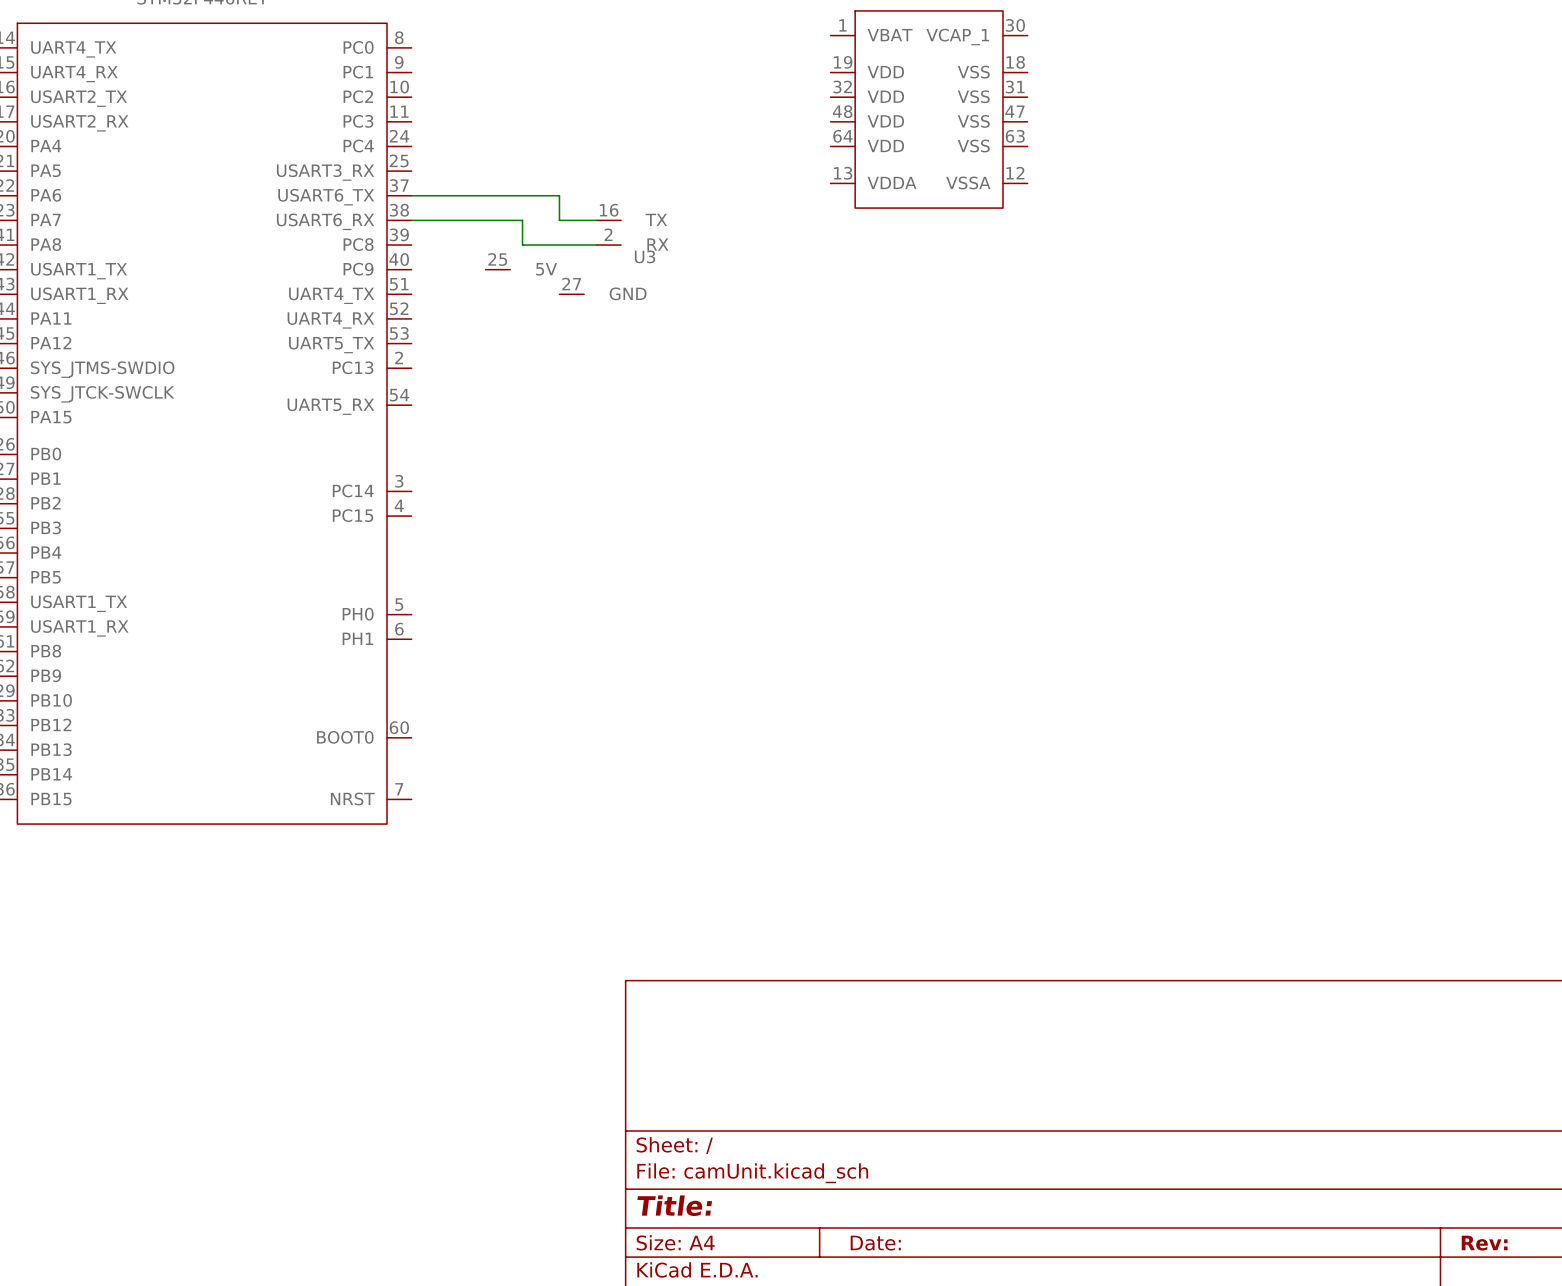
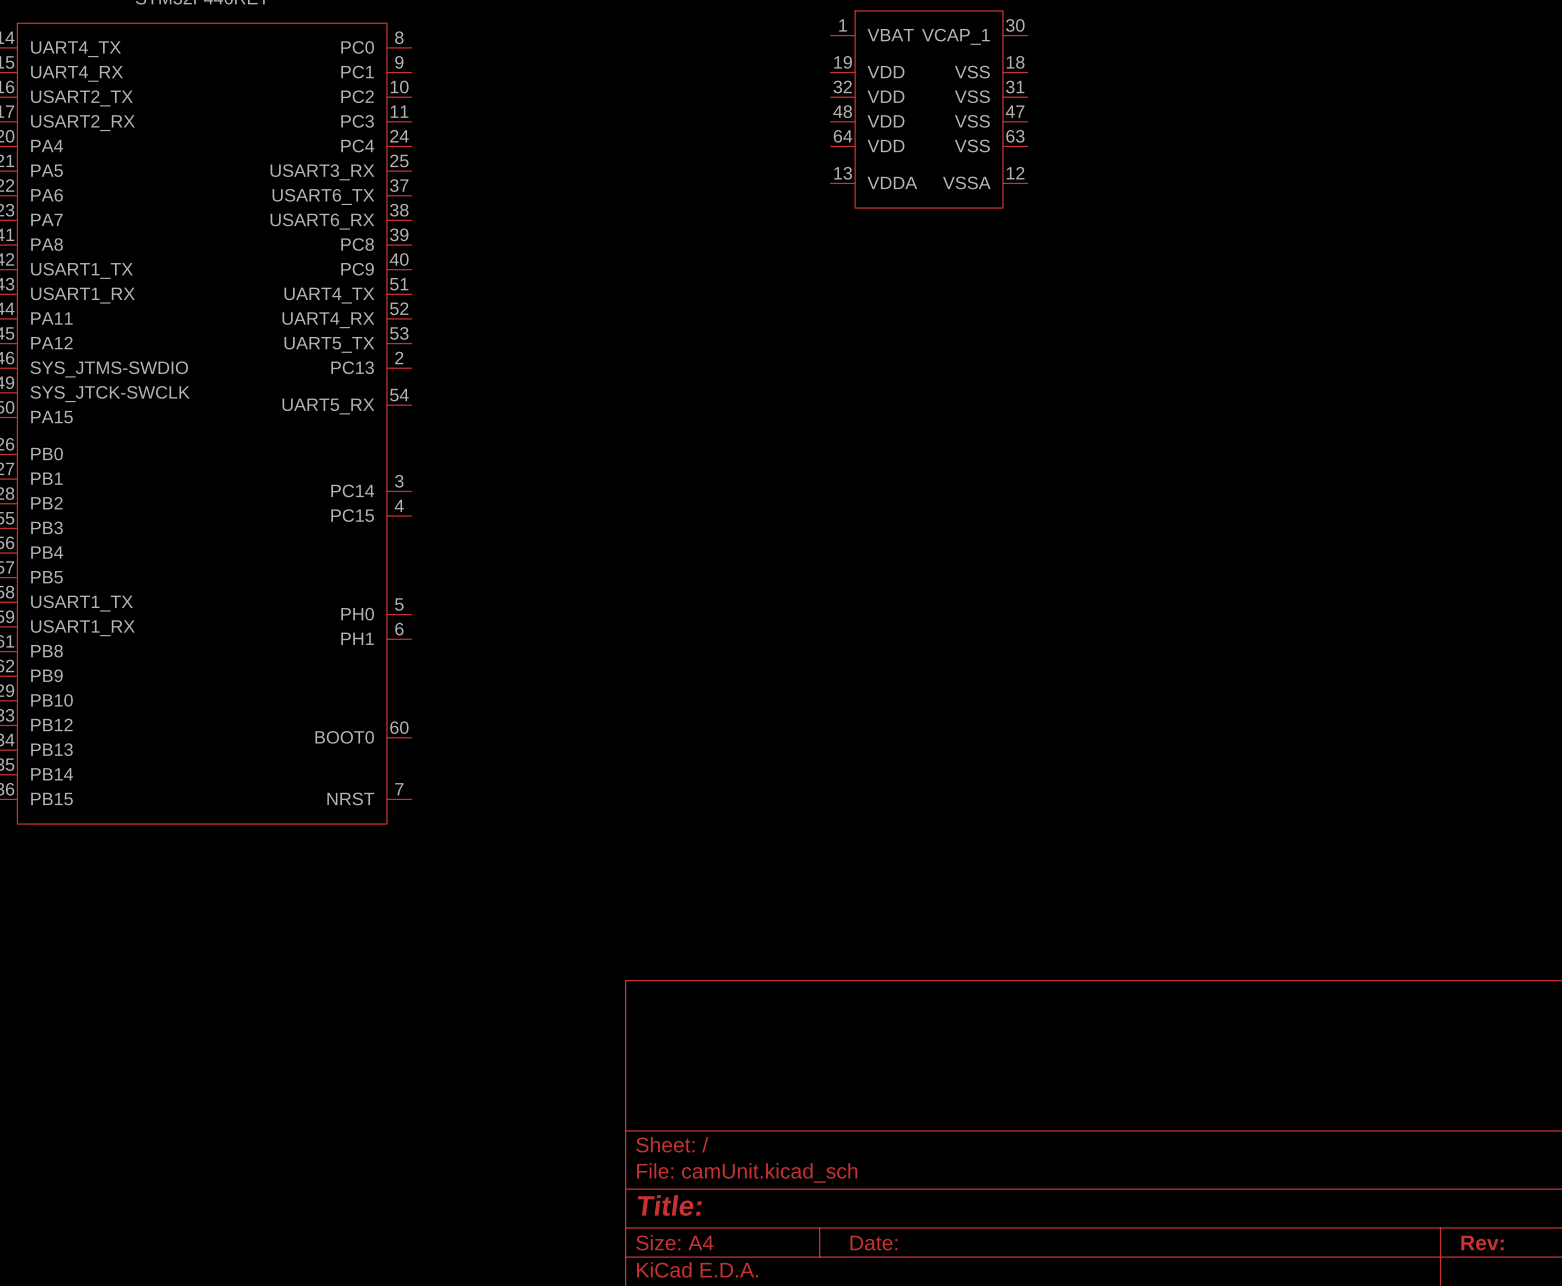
wire: (411, 195) (559, 195) (559, 220) (596, 220) -> none
wire: (411, 220) (522, 220) (522, 245) (596, 245) -> none
U3: (553, 257) -> none

